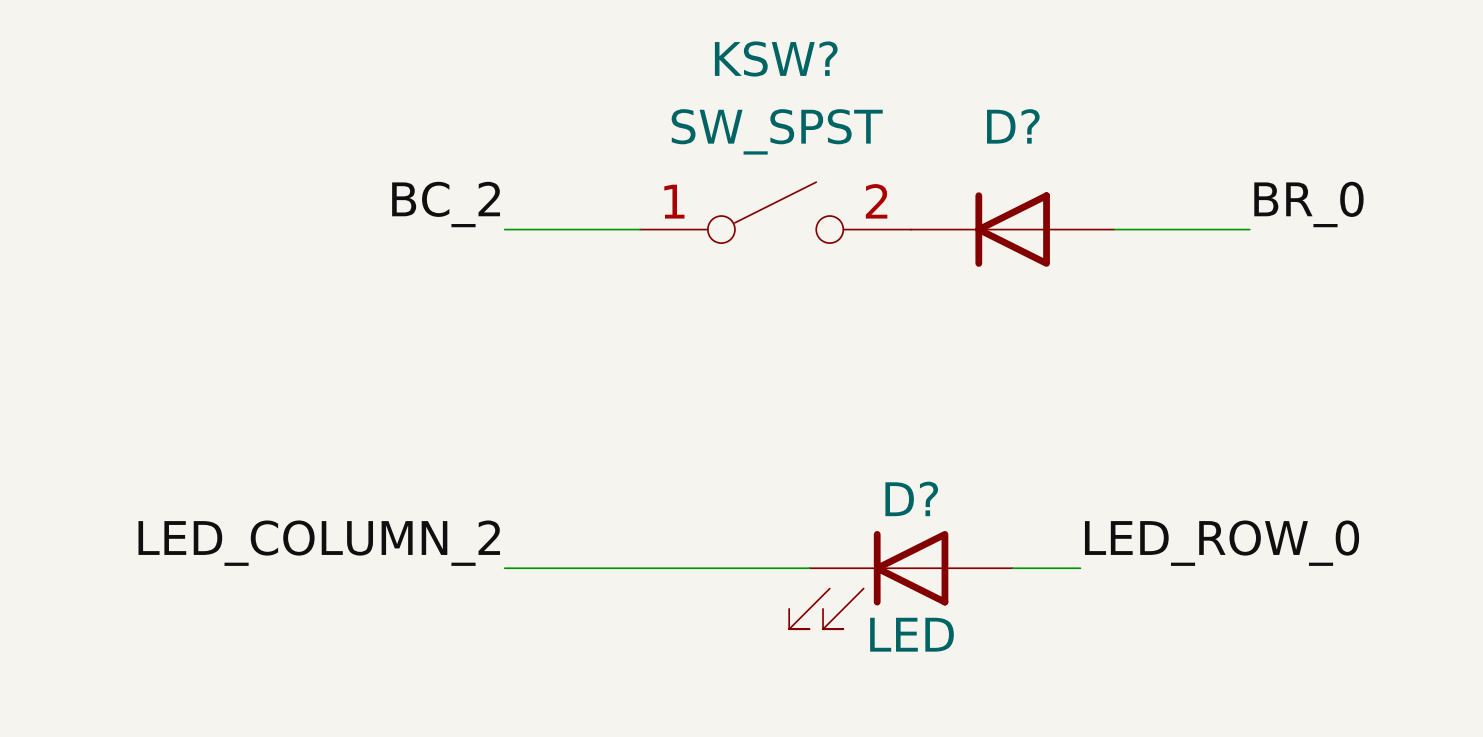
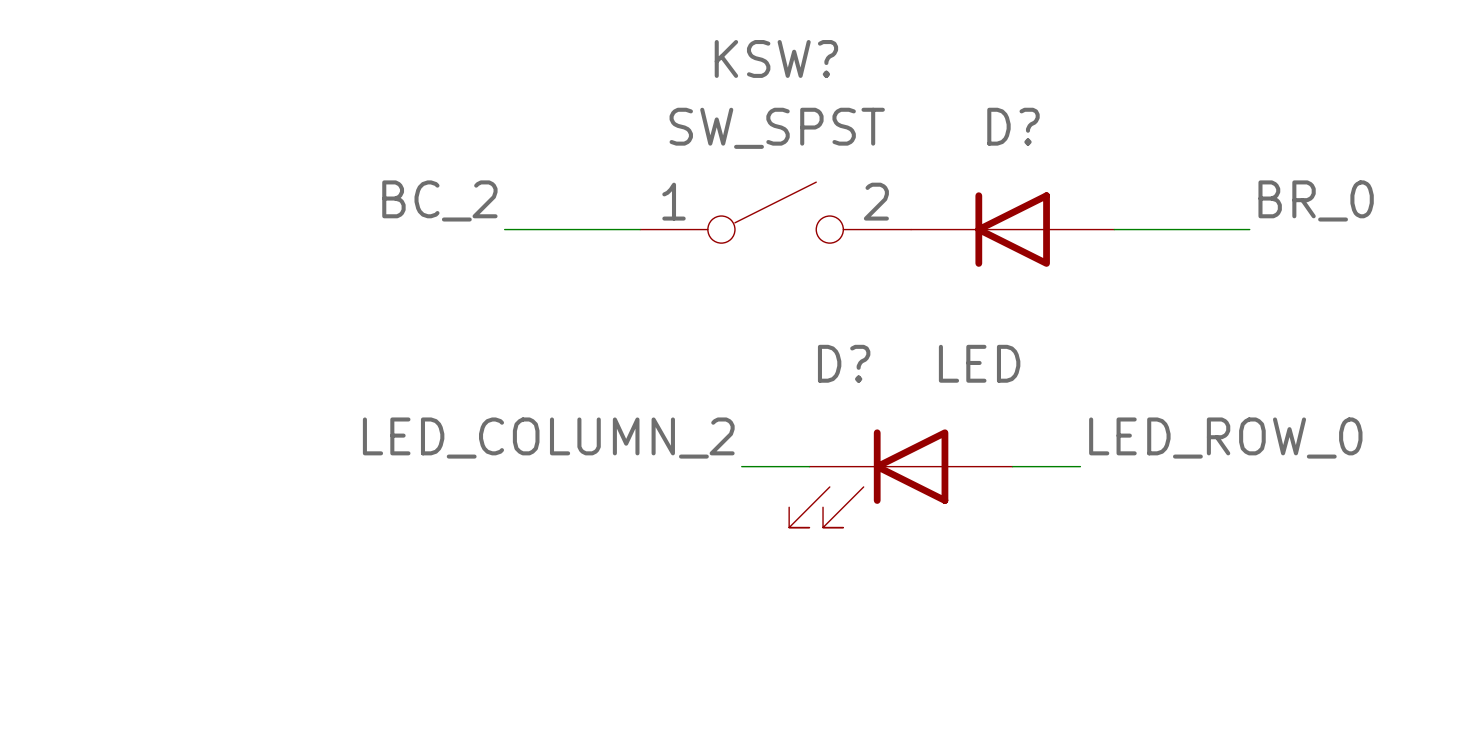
wire: none -> (741, 466) (809, 466)
D? name position: D? (911, 498) -> D? (844, 363)
label position: LED_COLUMN_2 (319, 543) -> LED_COLUMN_2 (548, 438)
label position: LED_ROW_0 (1222, 543) -> LED_ROW_0 (1225, 438)
wire: (504, 568) (809, 568) -> none
wire: (1012, 568) (1080, 568) -> (1012, 466) (1080, 466)
D? position: (900, 580) -> (900, 478)
D? value position: LED (911, 634) -> LED (979, 363)

